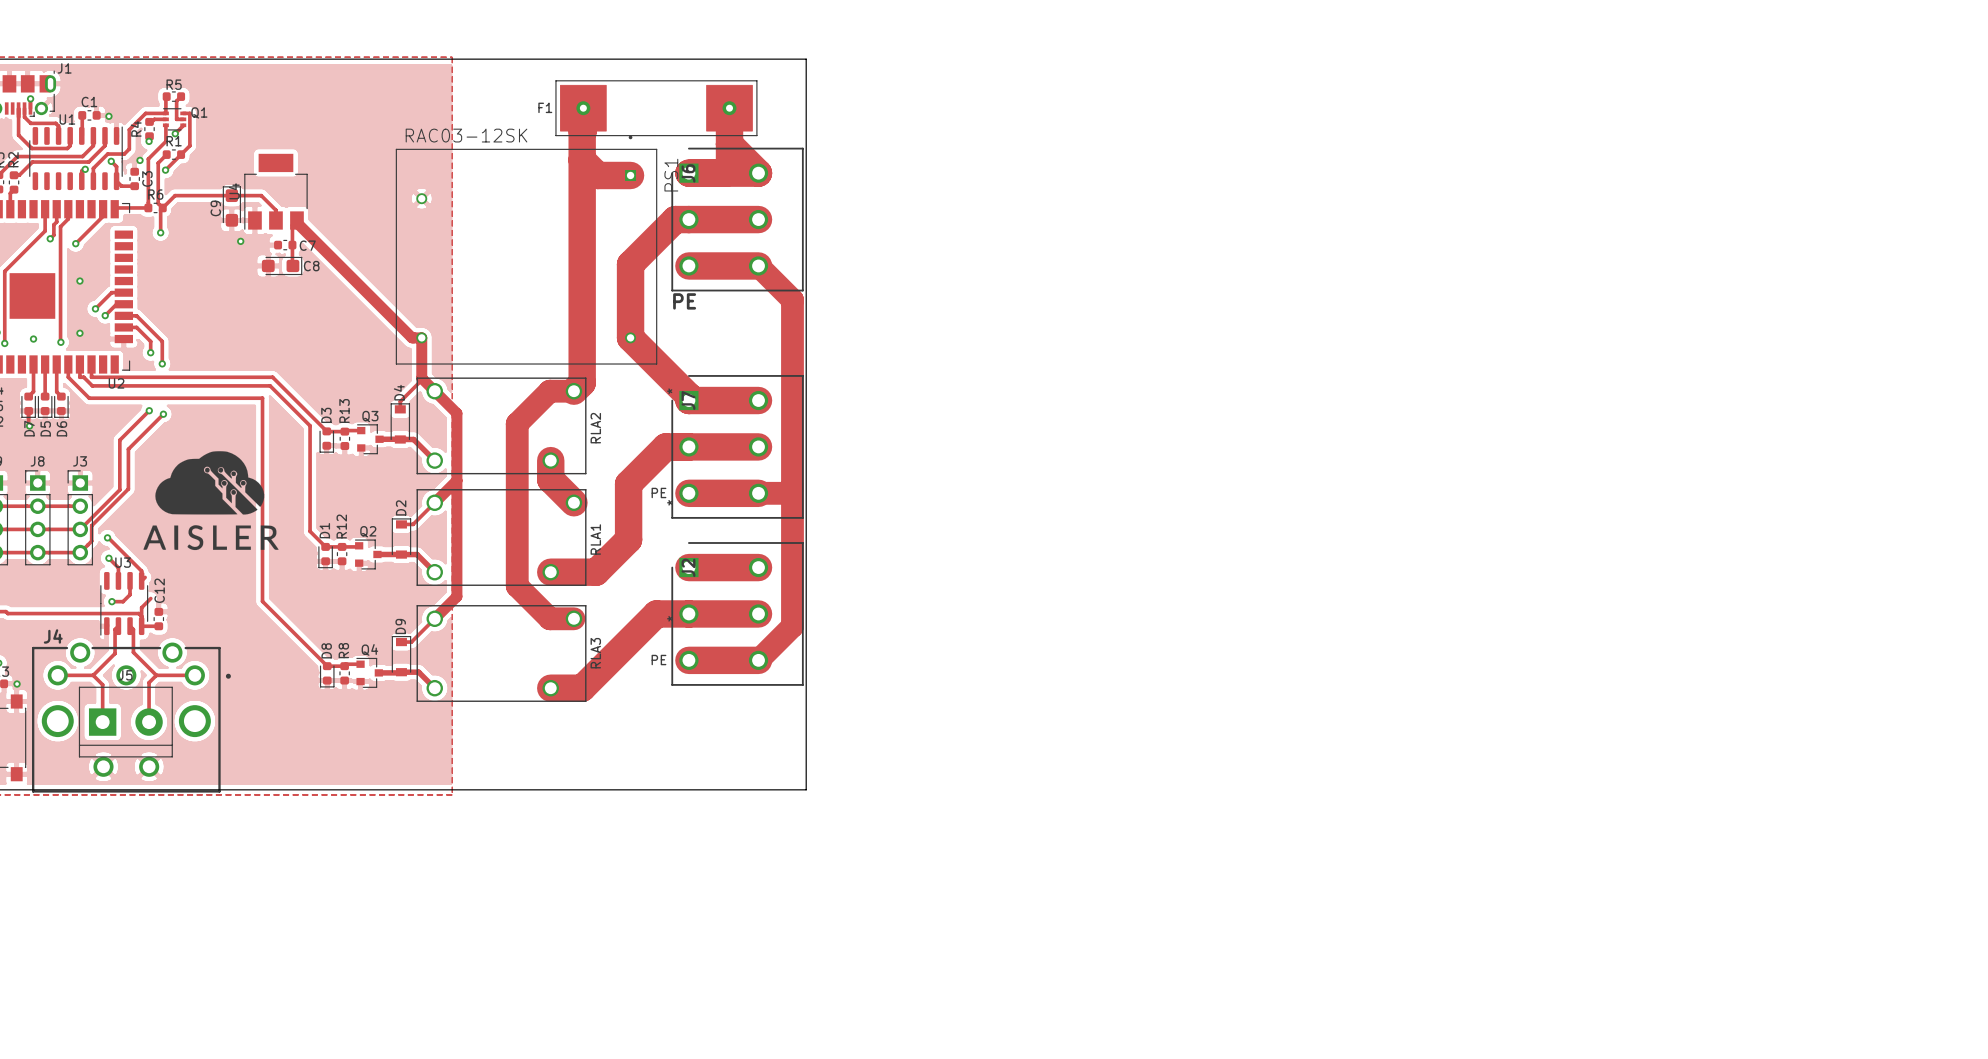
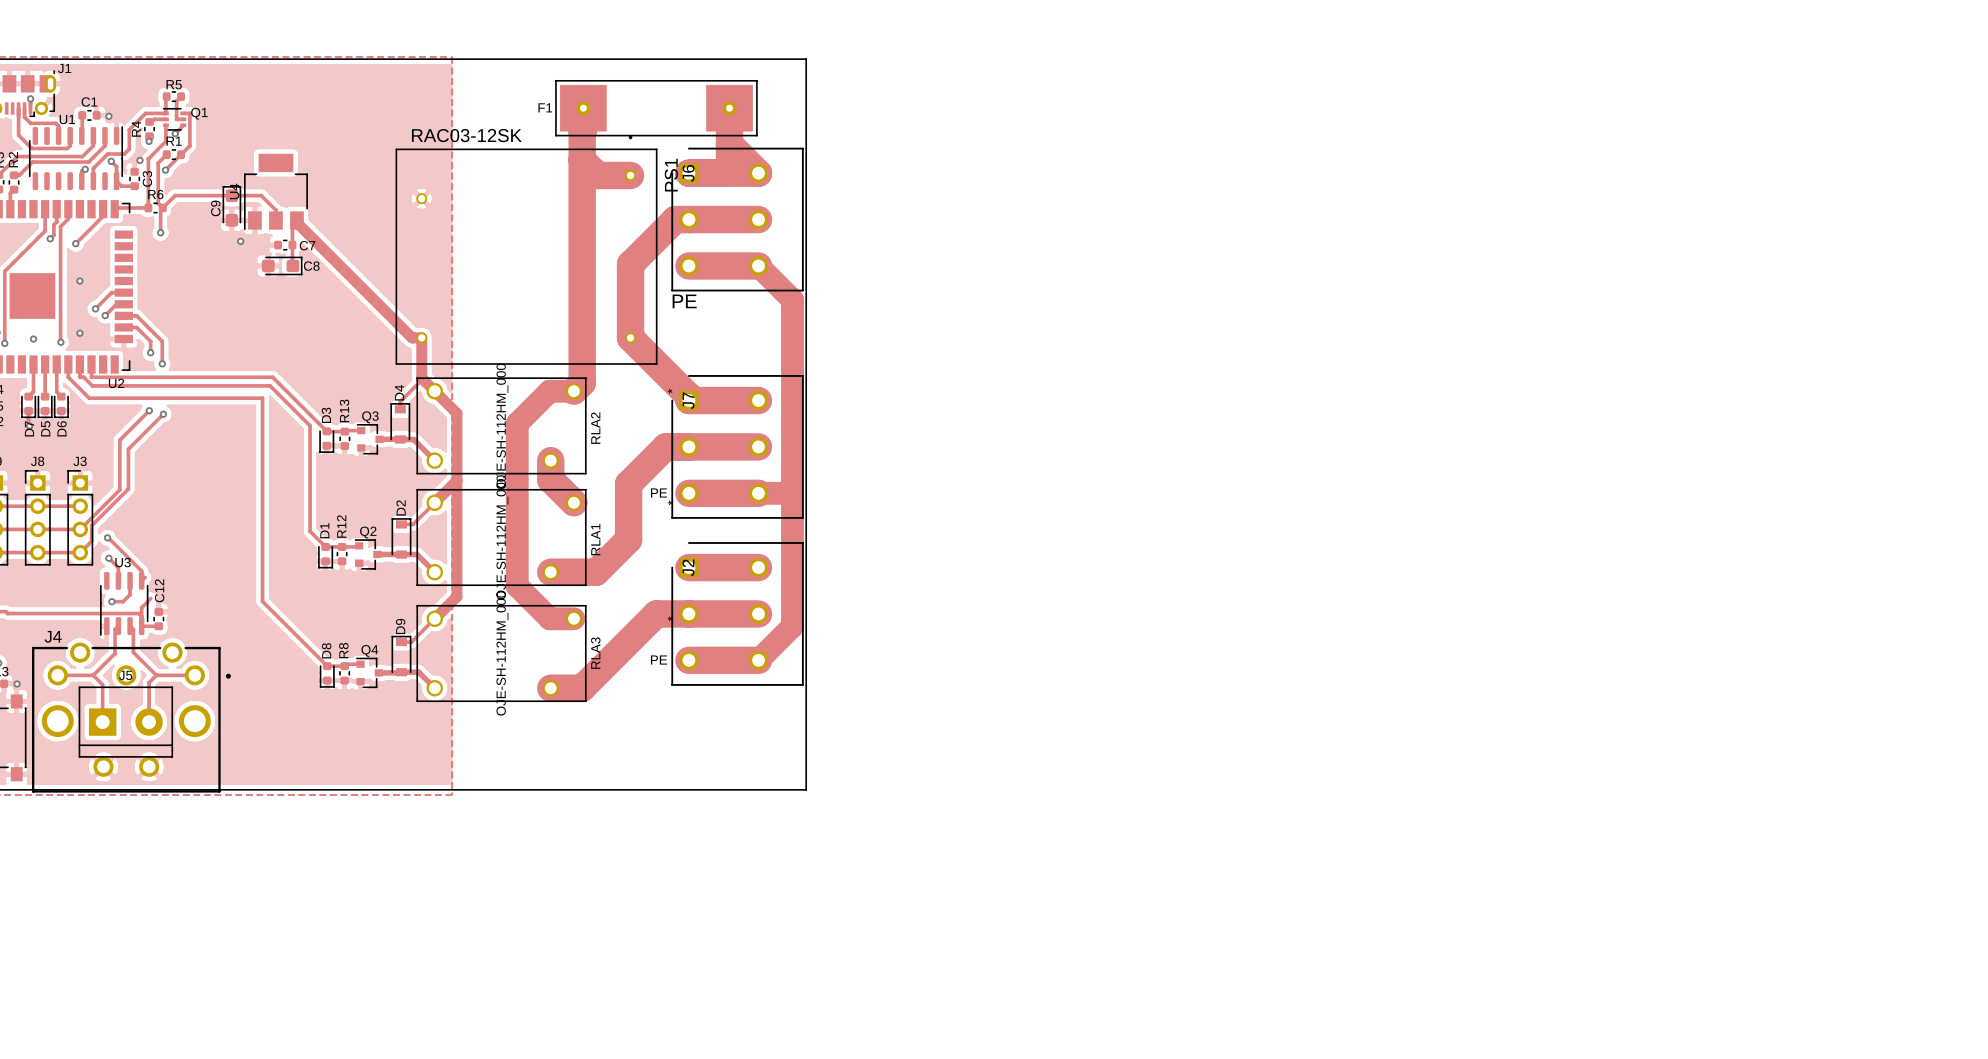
RLA2 value: none -> OJE-SH-112HM_000 (502, 425)
drawing: [143, 451, 279, 551] -> none
RLA1 value: none -> OJE-SH-112HM_000 (502, 537)
RLA3 value: none -> OJE-SH-112HM_000 (502, 653)

